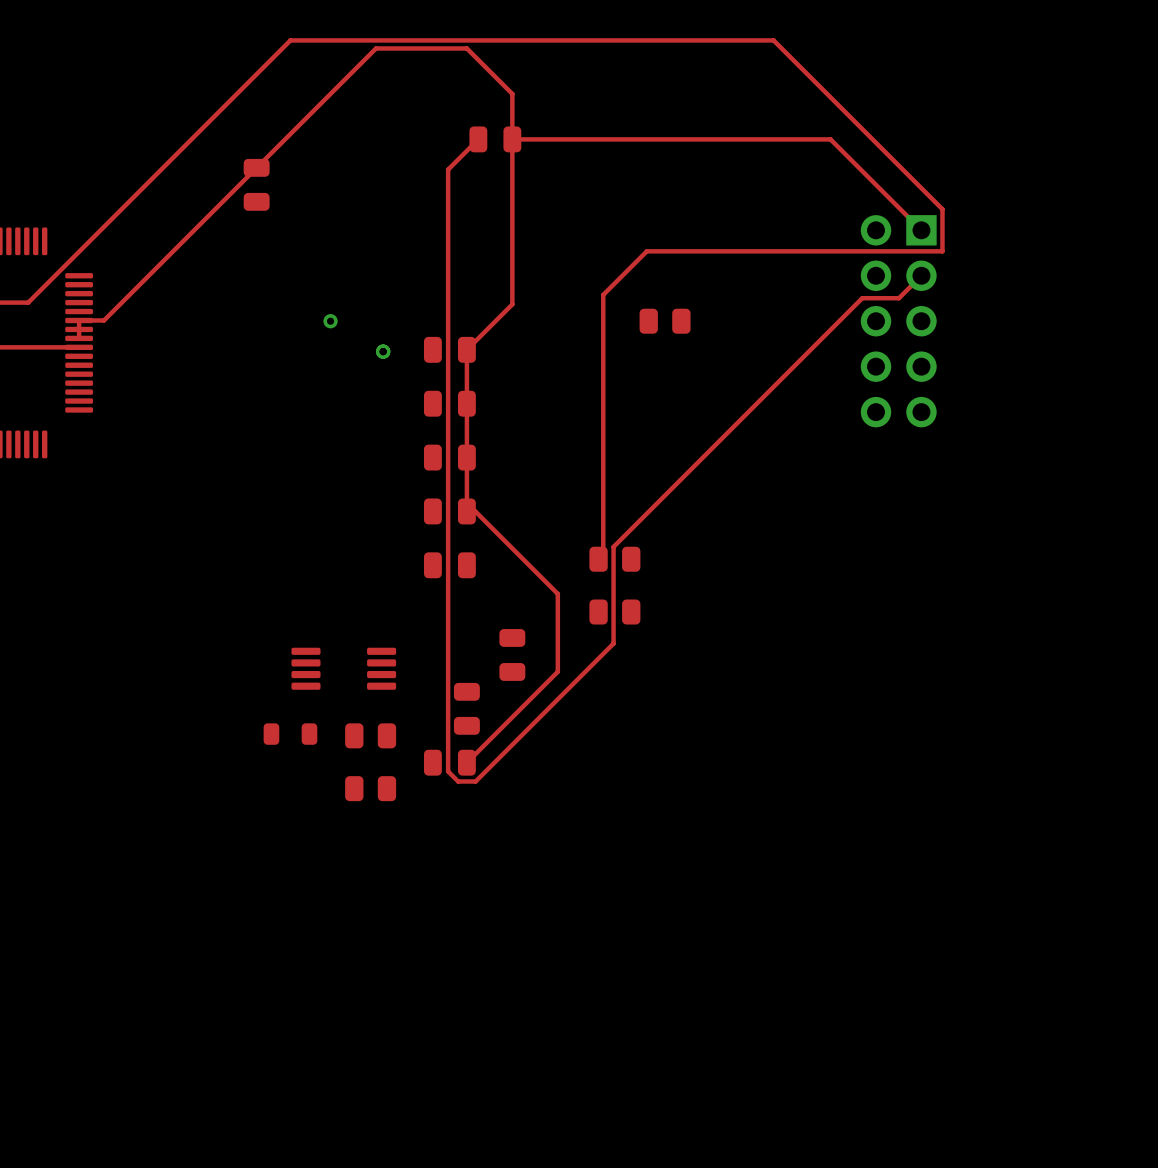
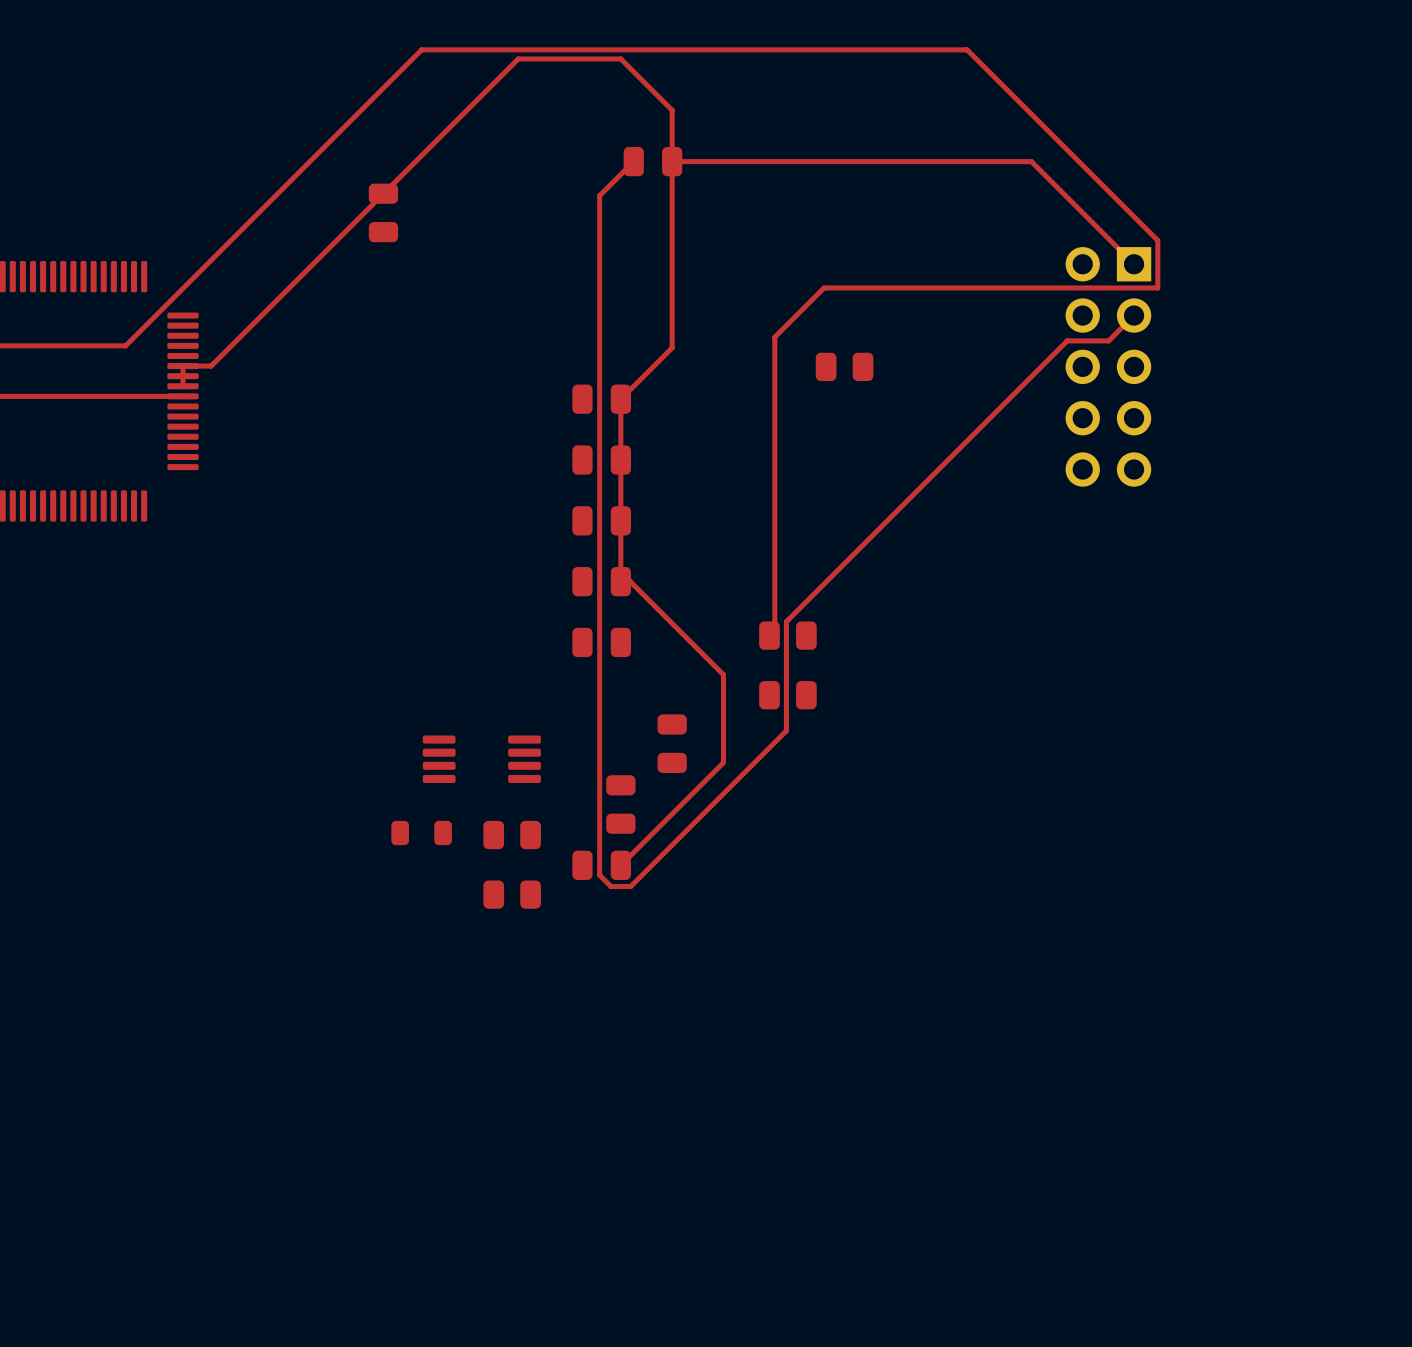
via: (330, 321) -> none
via: (383, 351) -> none

